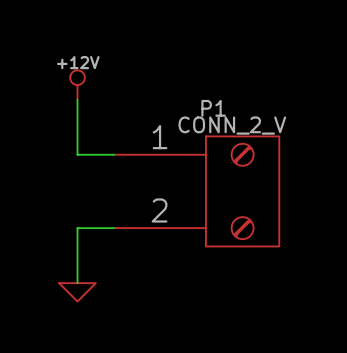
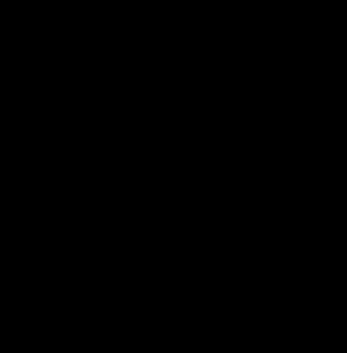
power symbol: +12V (77, 85) -> none
wire: (77, 99) (77, 154) (114, 154) -> none
P1: CONN_2_V (196, 191) -> none
wire: (114, 228) (77, 228) (77, 283) -> none
power symbol: (77, 292) -> none

